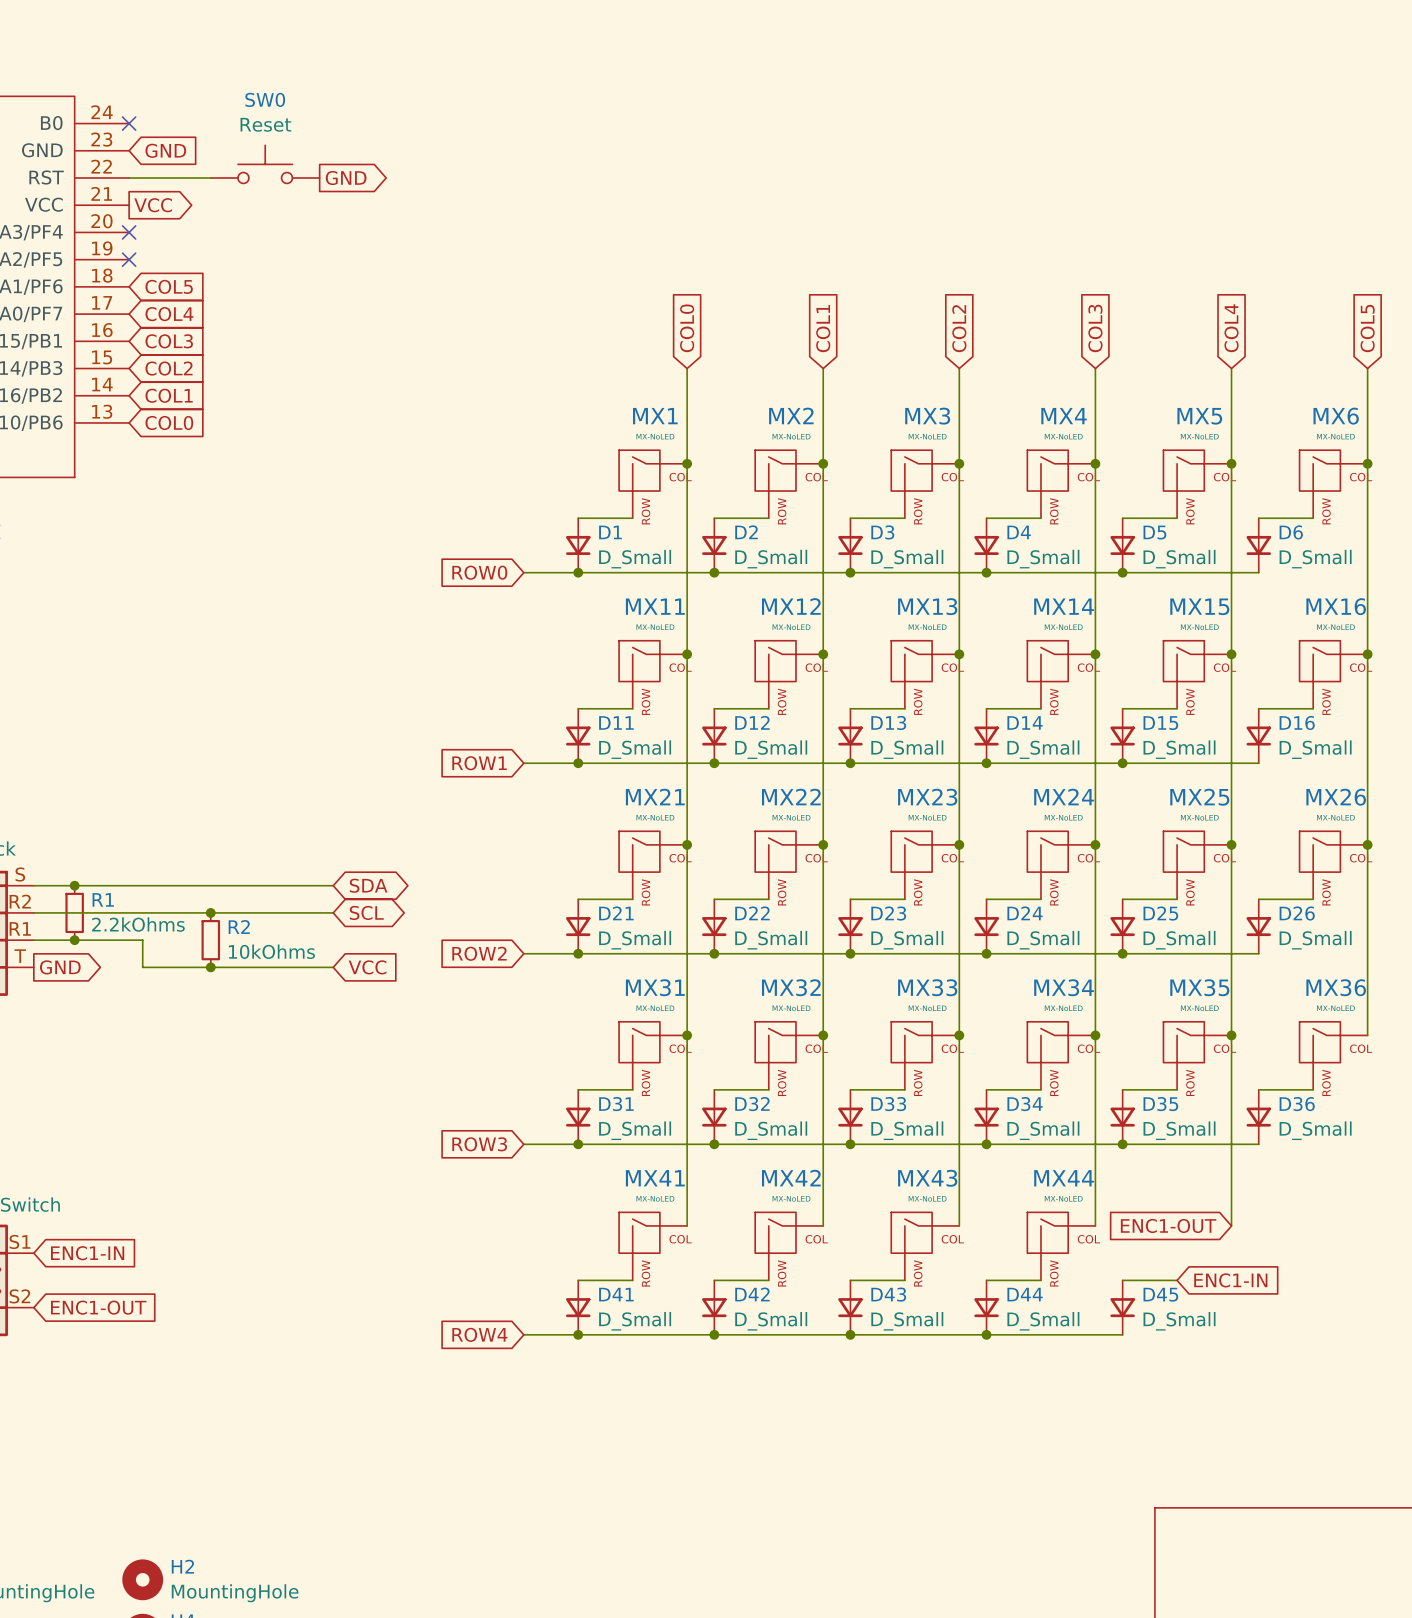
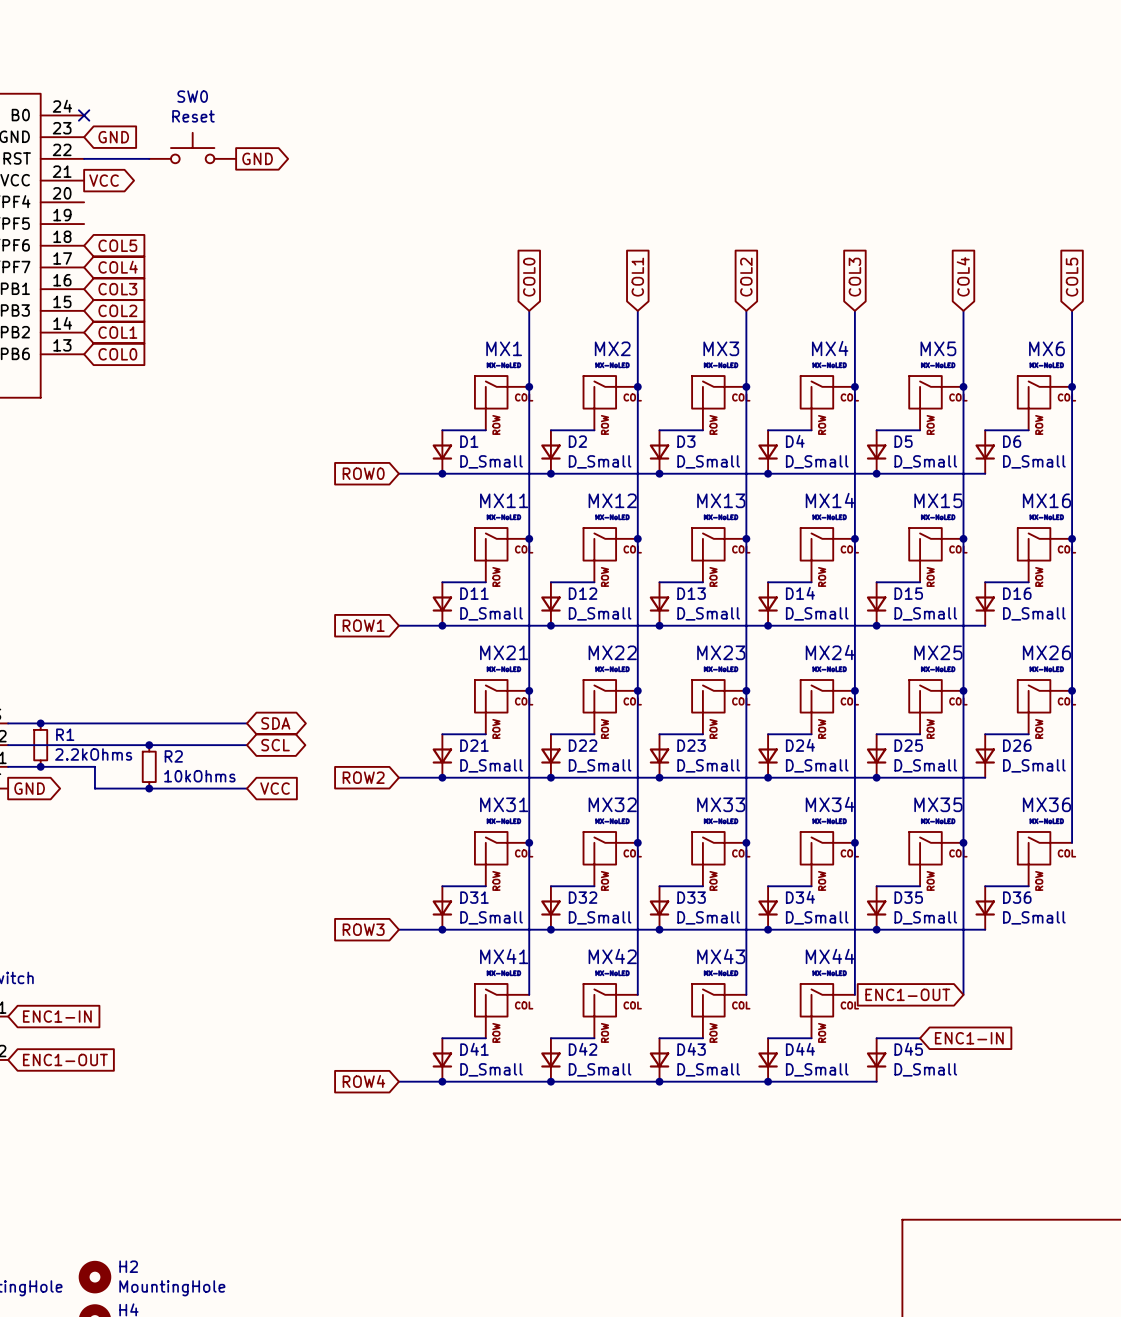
no-connect mark: (129, 232) -> none
no-connect mark: (129, 259) -> none

